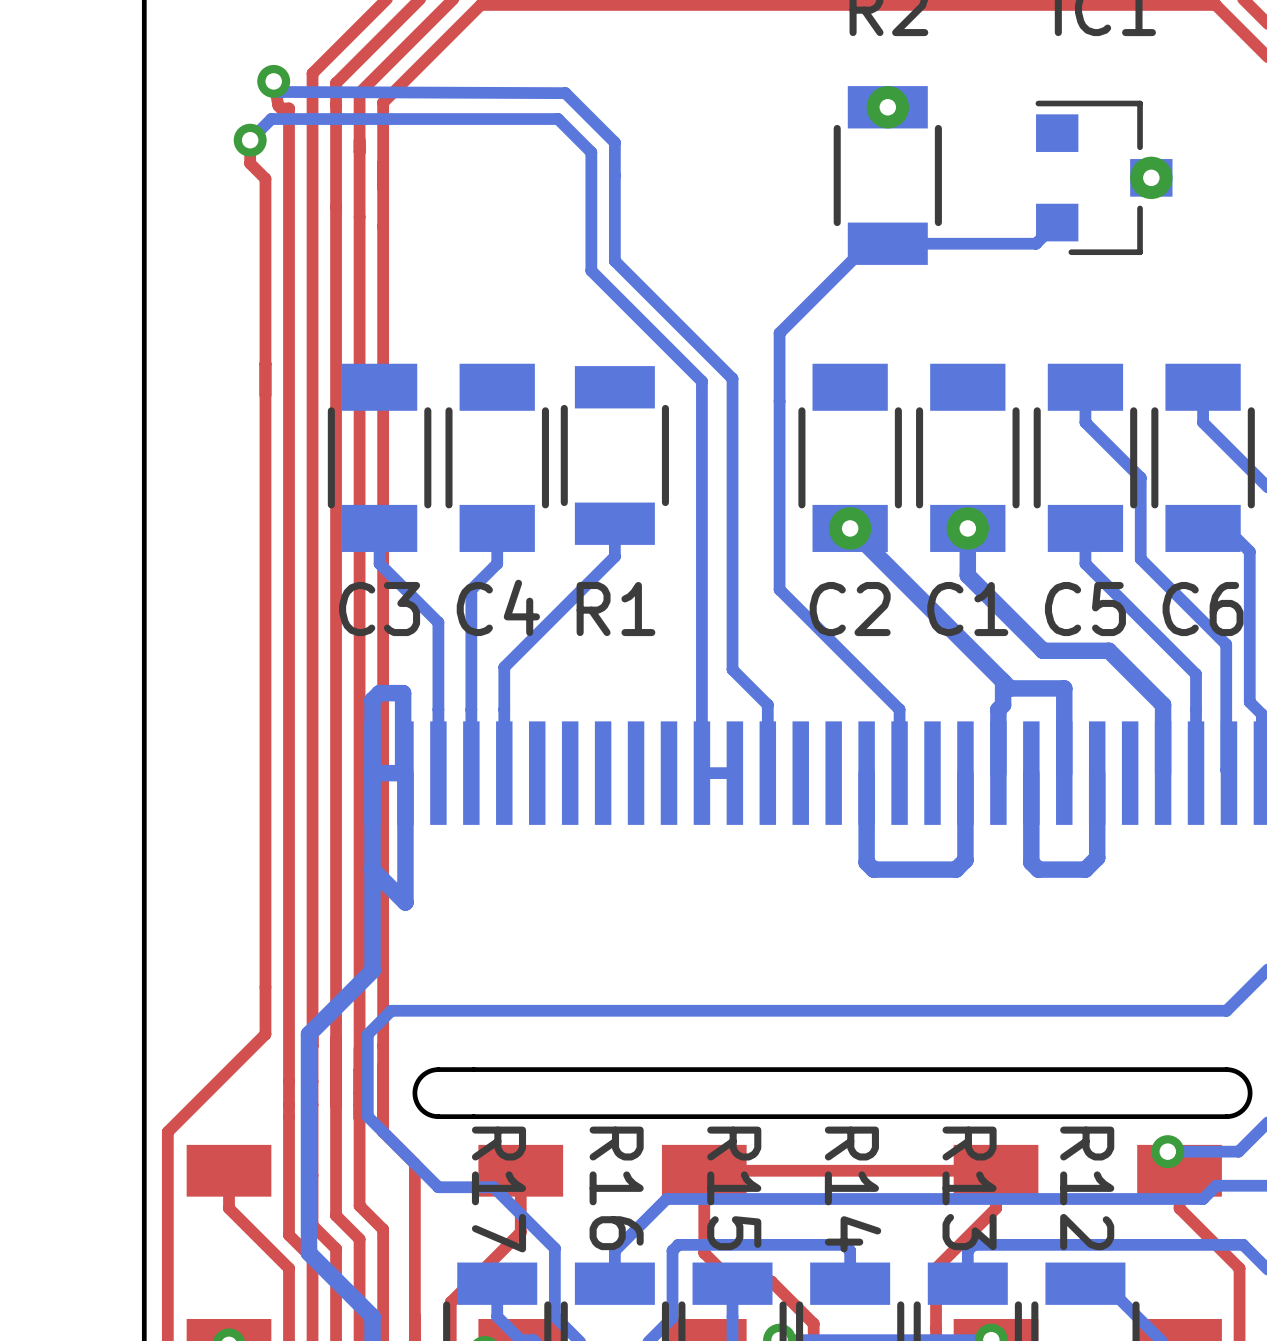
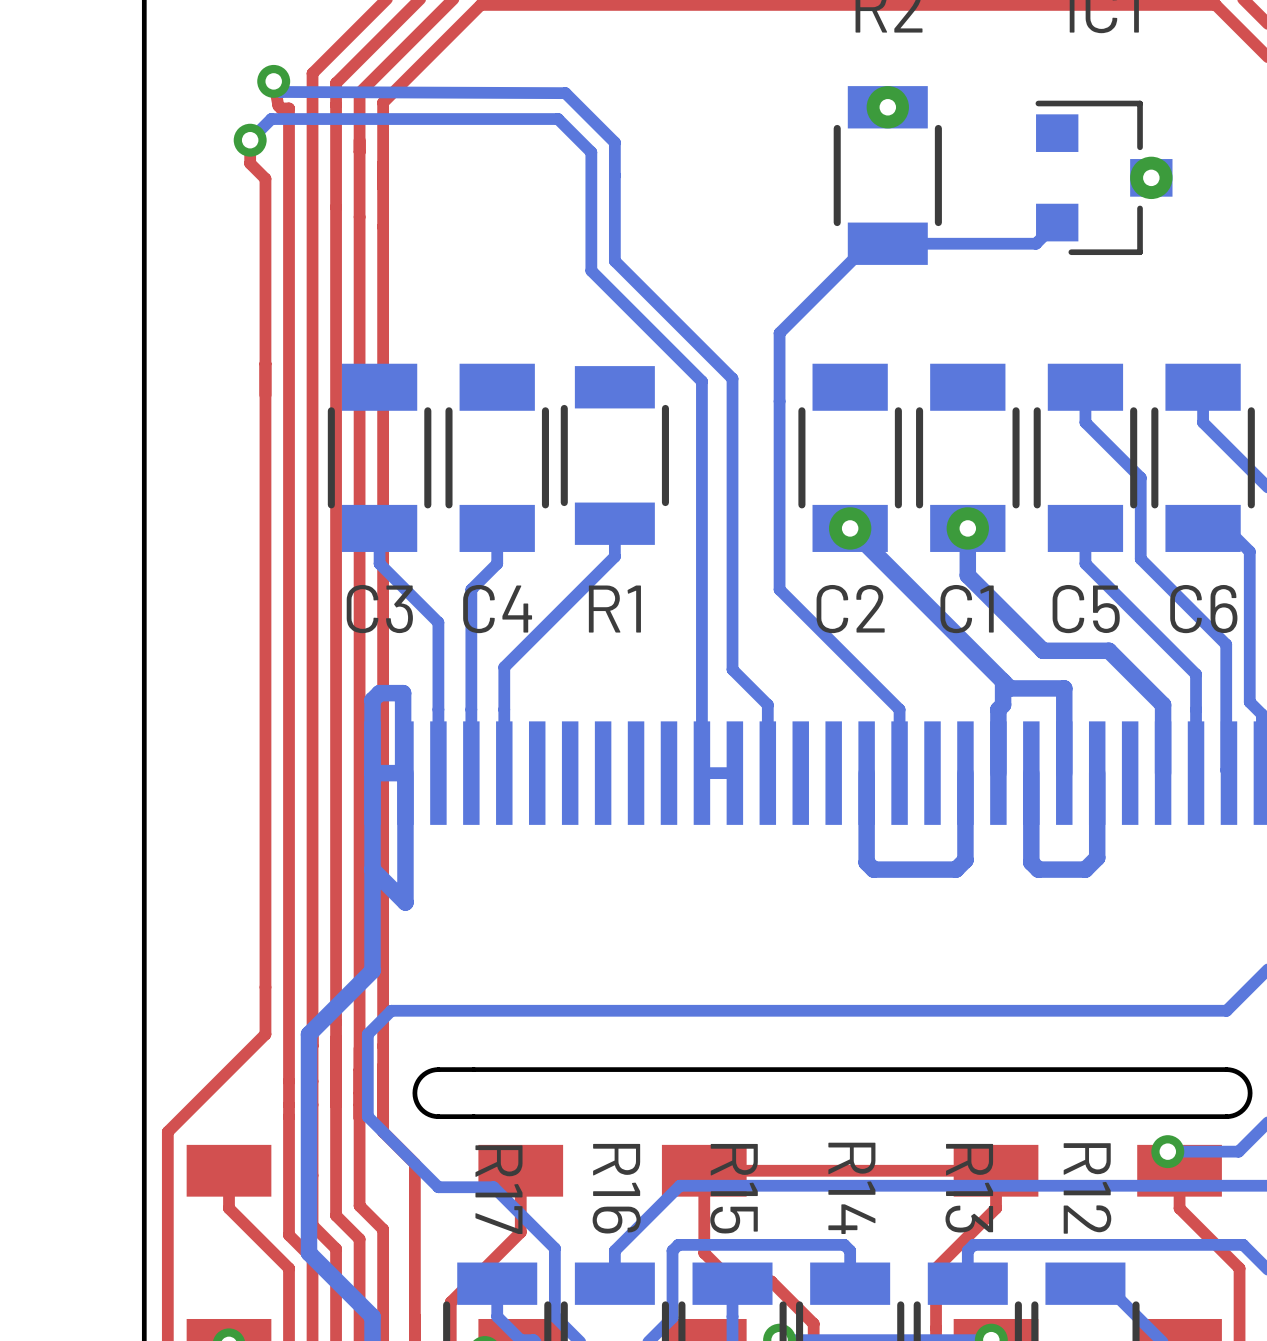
bottom track: (1216, 1185) (1203, 1199) (666, 1199) -> (1216, 1185) (679, 1185) (666, 1199)

